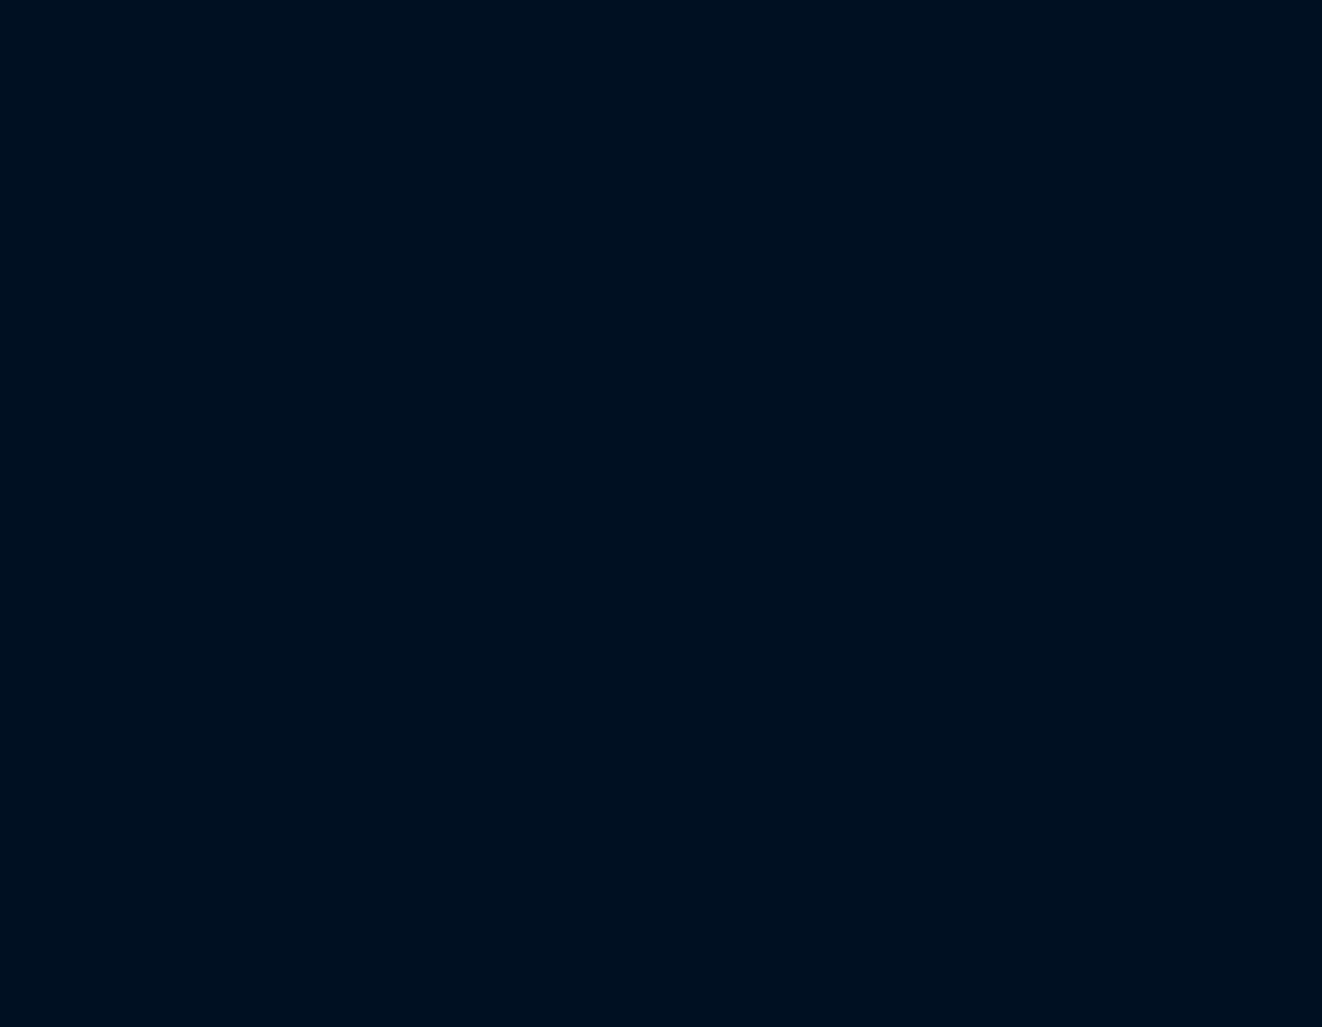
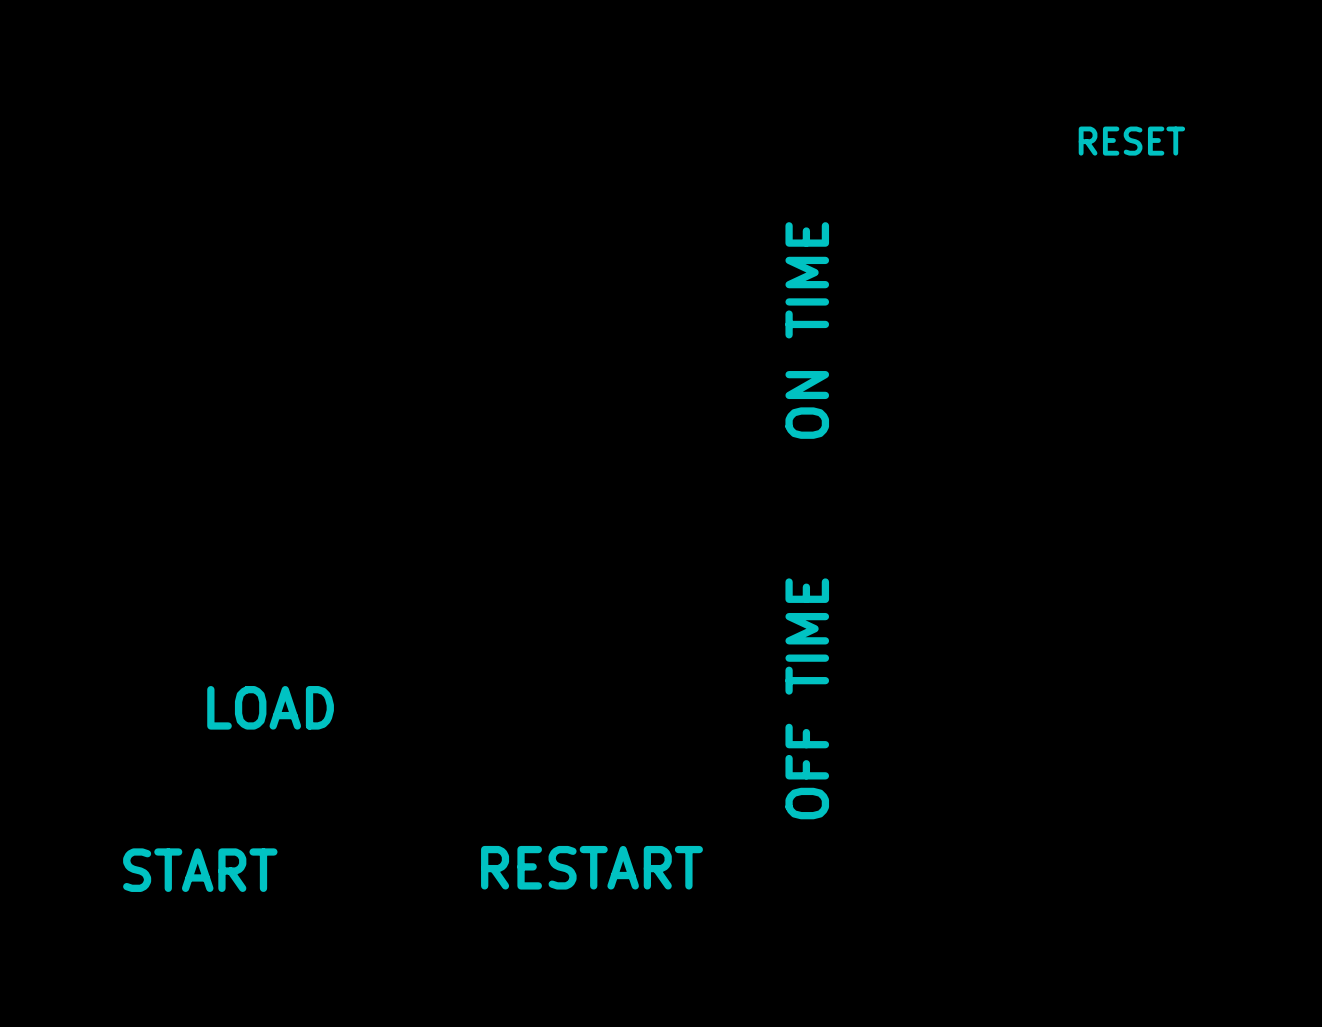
text: none -> RESET (1131, 141)
text: none -> ON TIME (807, 330)
text: none -> LOAD (270, 707)
text: none -> OFF TIME (807, 698)
text: none -> RESTART (591, 867)
text: none -> START (200, 870)

